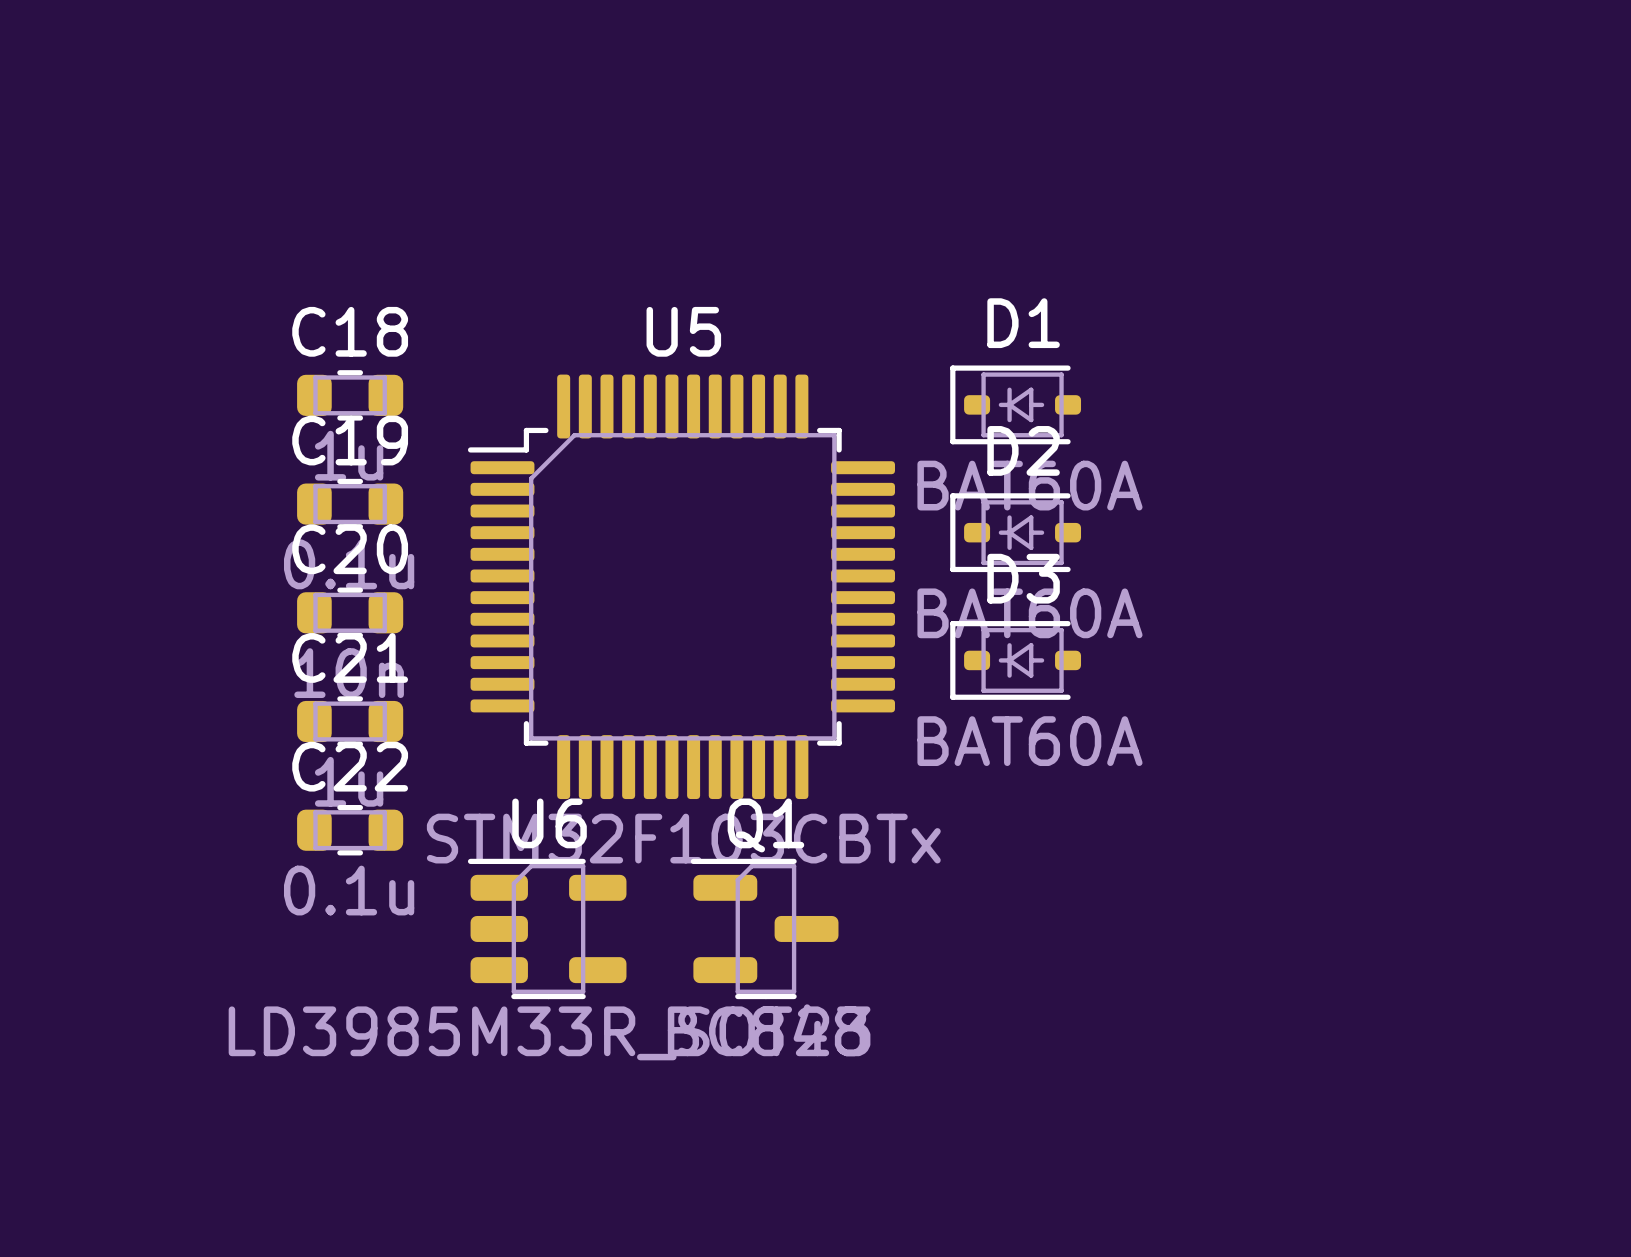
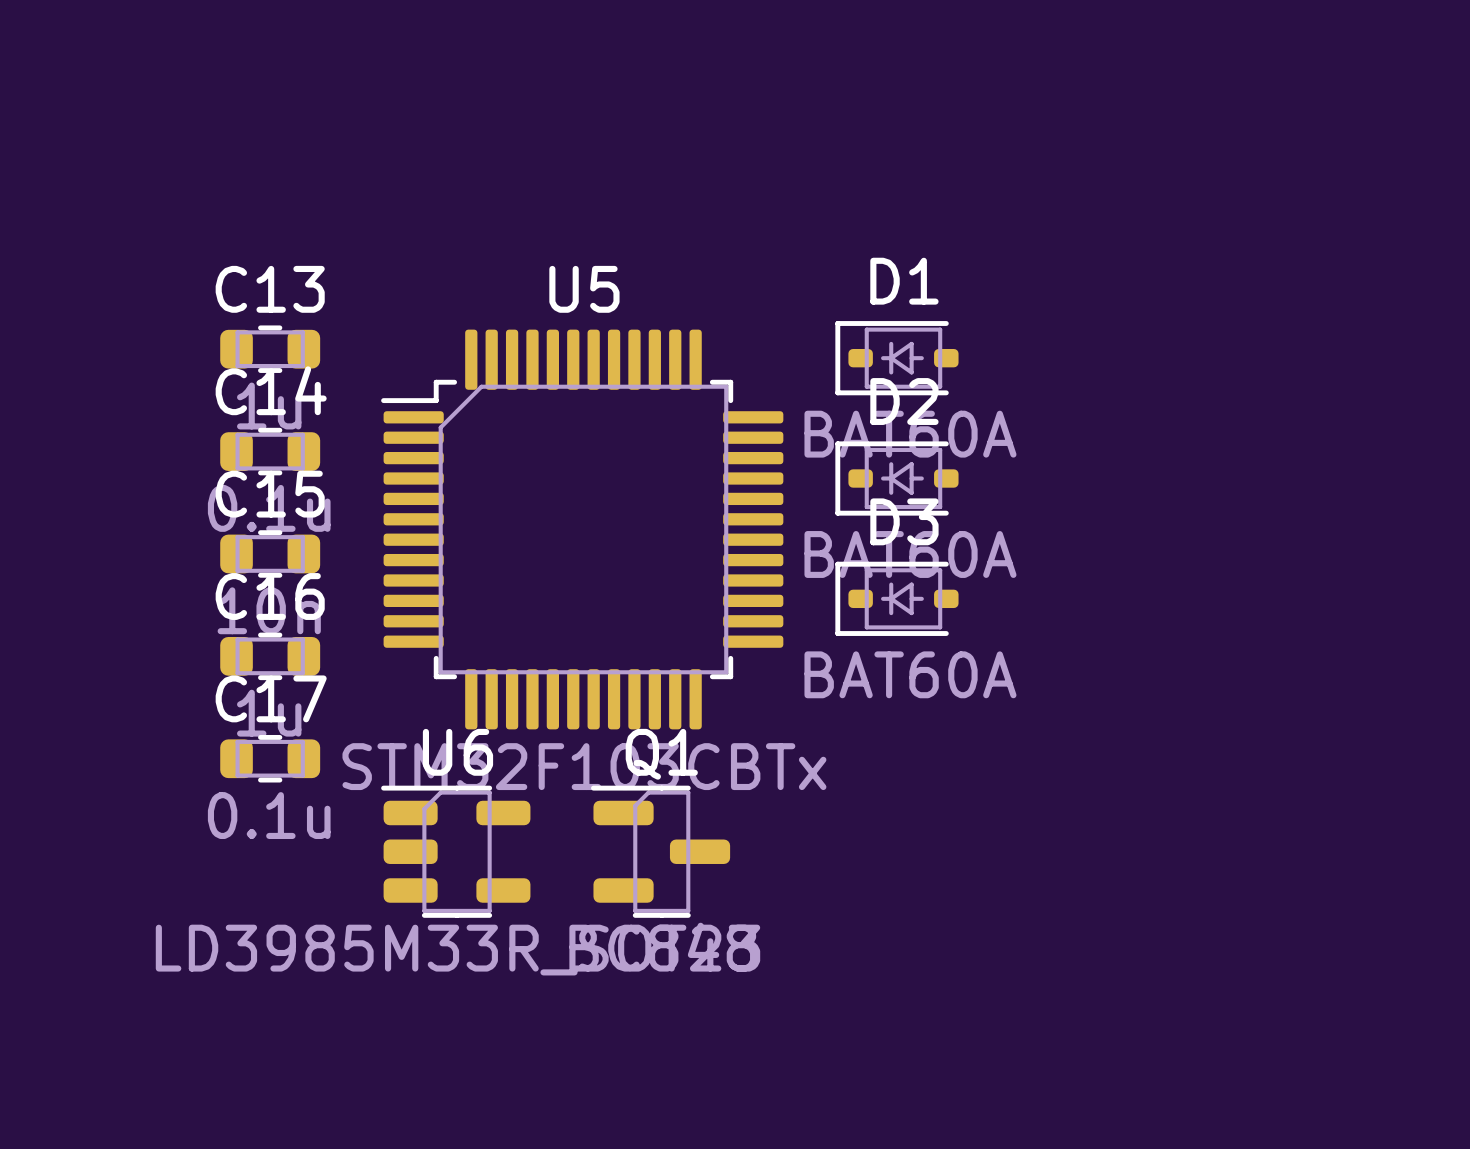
C18 name: C18 (350, 331) -> C13 (270, 289)
C19 name: C19 (350, 440) -> C14 (271, 390)
C20 name: C20 (350, 549) -> C15 (270, 494)
C21 name: C21 (350, 657) -> C16 (270, 596)
C22 name: C22 (350, 766) -> C17 (271, 698)

